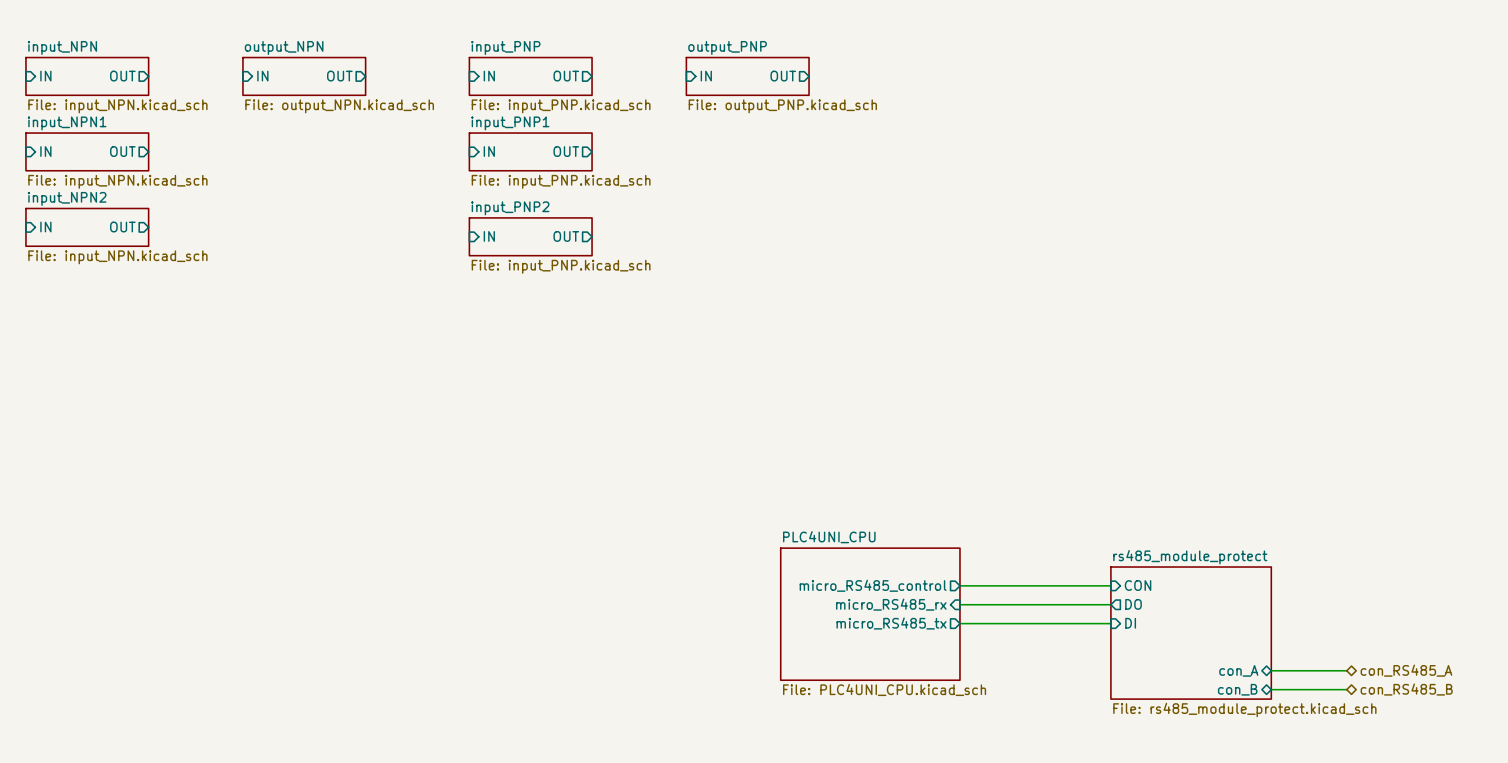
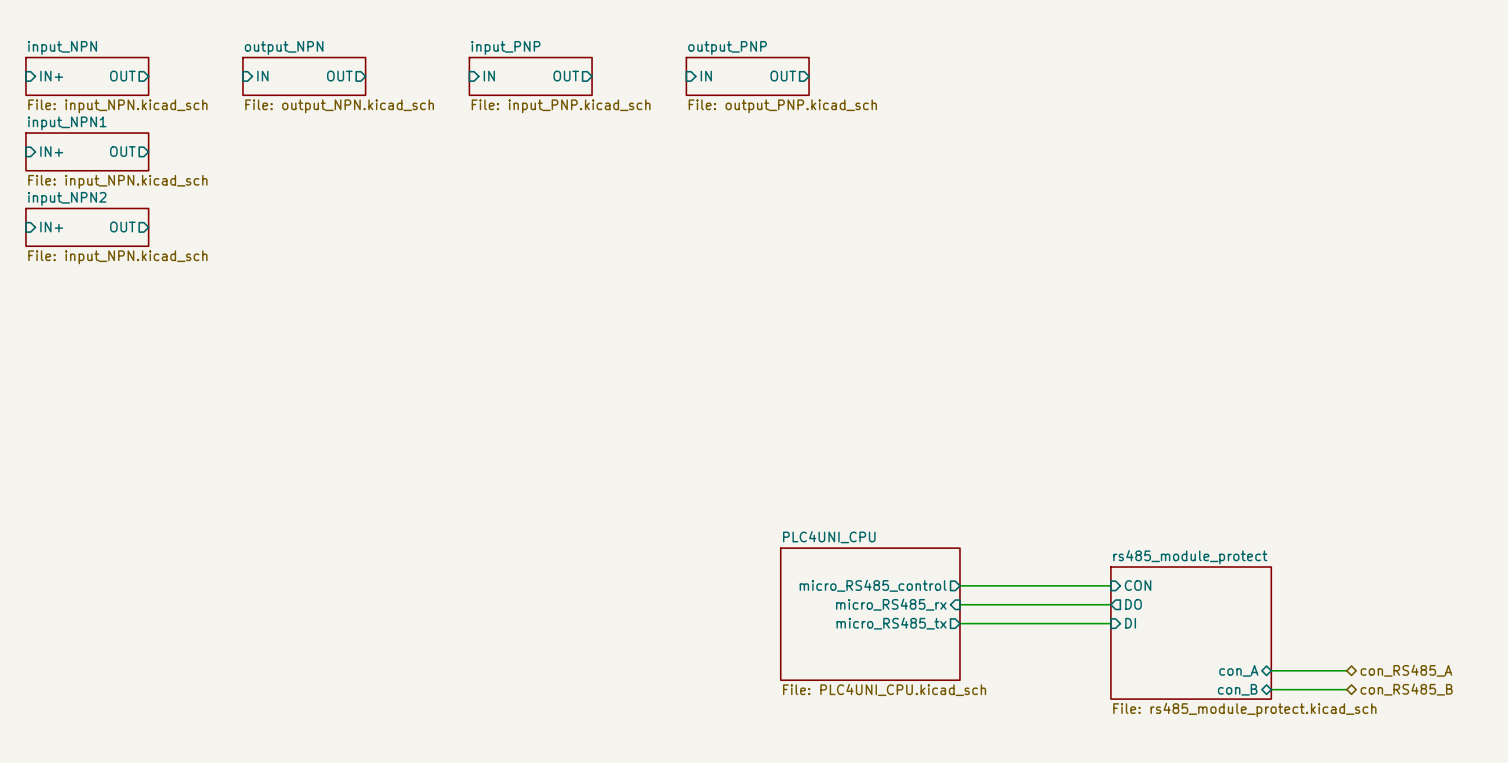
sheet pin: IN (45, 76) -> IN+ (51, 76)
sheet pin: IN (45, 151) -> IN+ (51, 151)
sheet pin: IN (489, 151) -> none
sheet input_PNP1: File: input_PNP.kicad_sch (530, 151) -> none
sheet pin: OUT (566, 151) -> none
sheet pin: IN (45, 227) -> IN+ (51, 227)
sheet pin: IN (489, 236) -> none
sheet input_PNP2: File: input_PNP.kicad_sch (530, 236) -> none
sheet pin: OUT (566, 236) -> none

